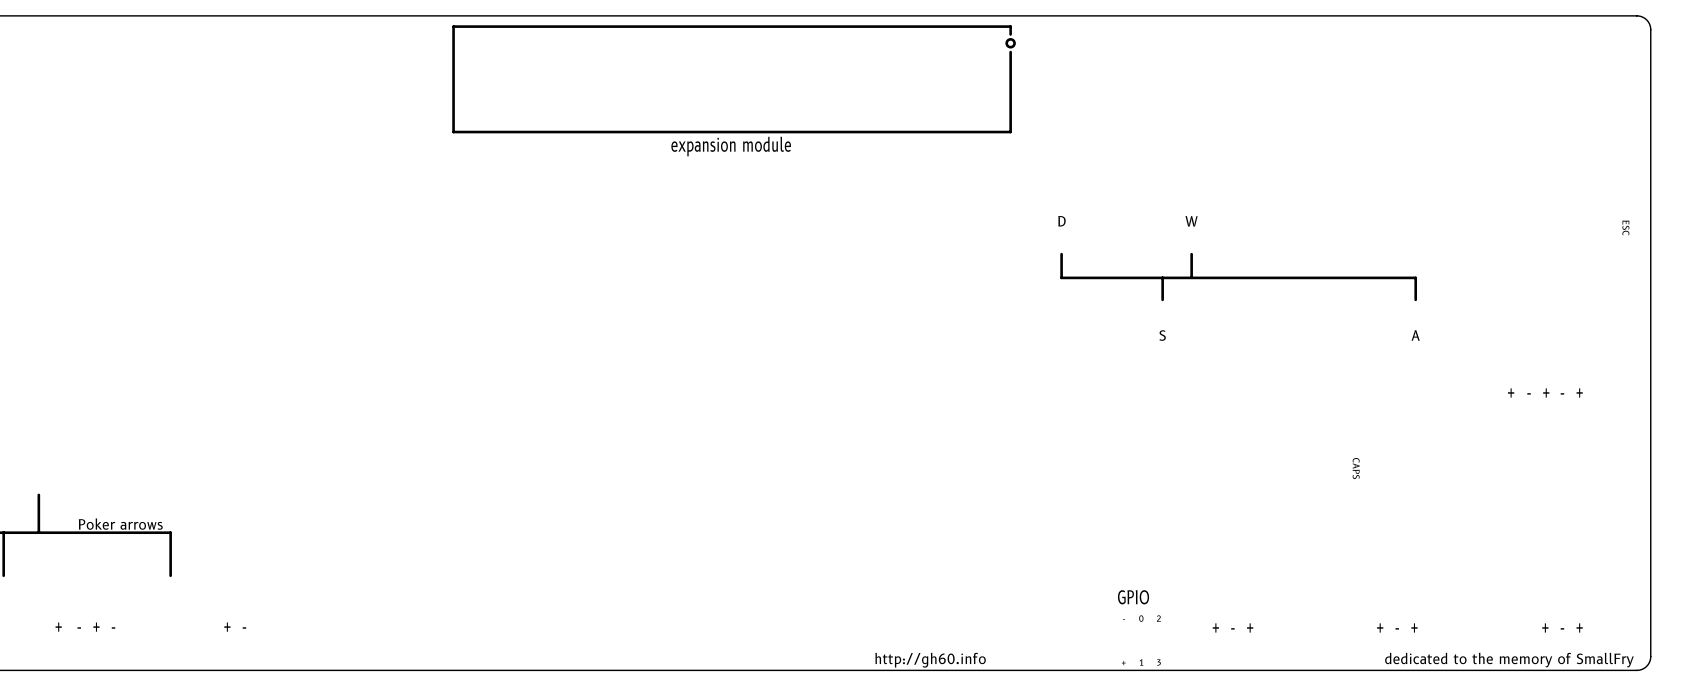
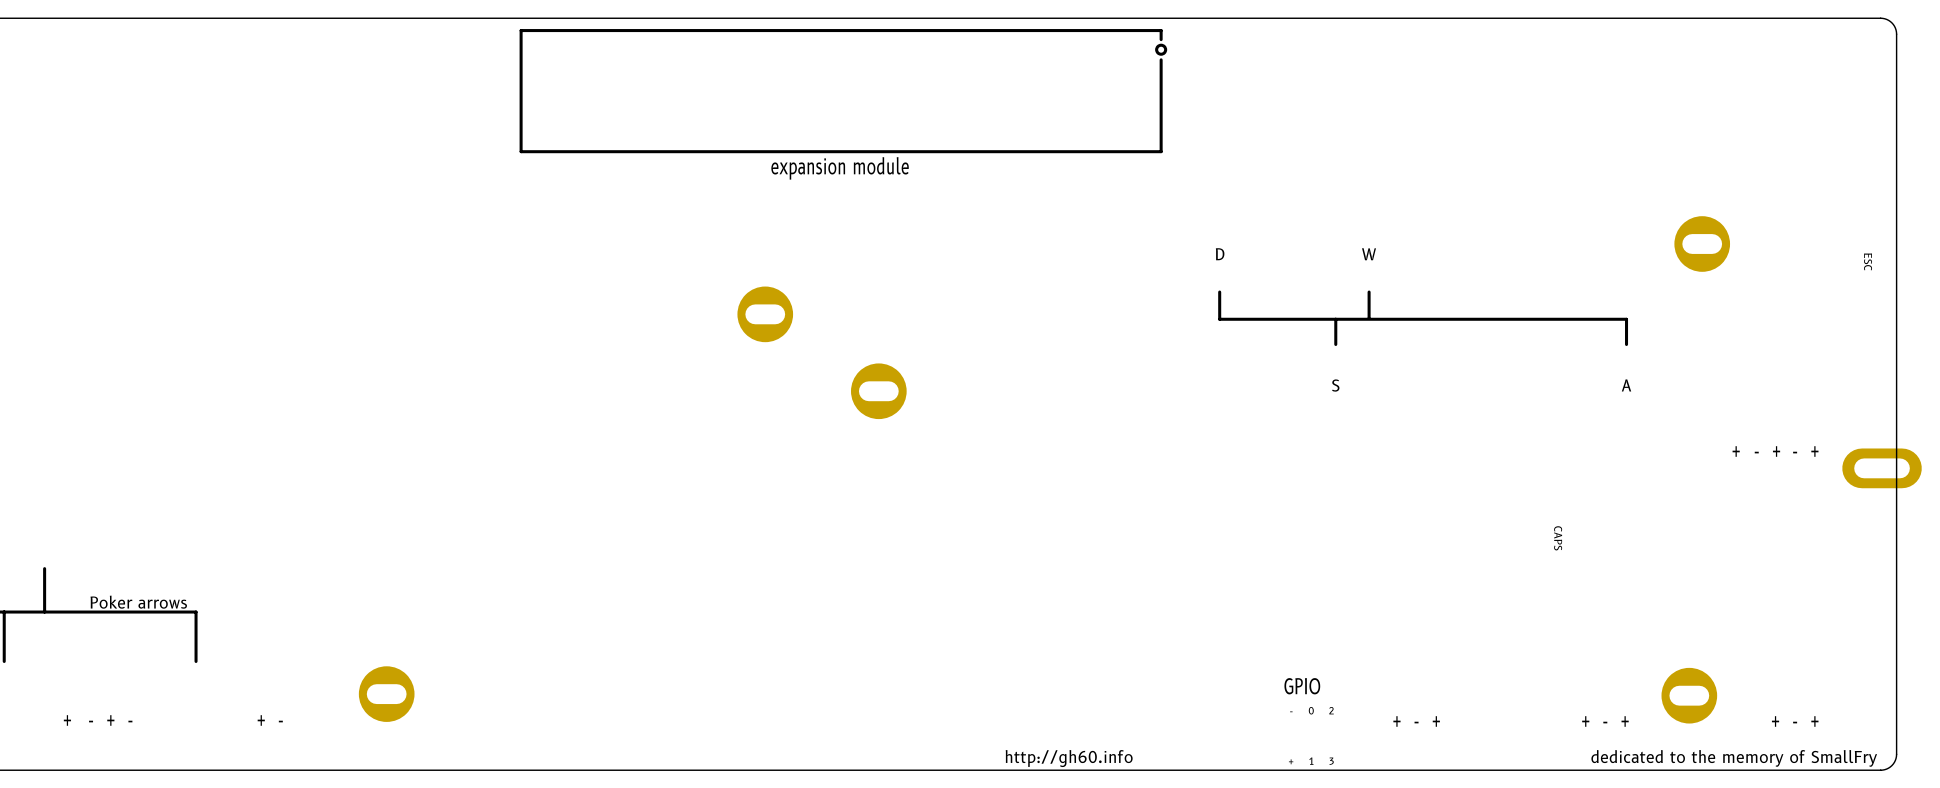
part: none -> (1702, 244)
part: none -> (765, 314)
part: none -> (878, 391)
part: none -> (1882, 468)
part: none -> (386, 694)
part: none -> (1689, 695)

